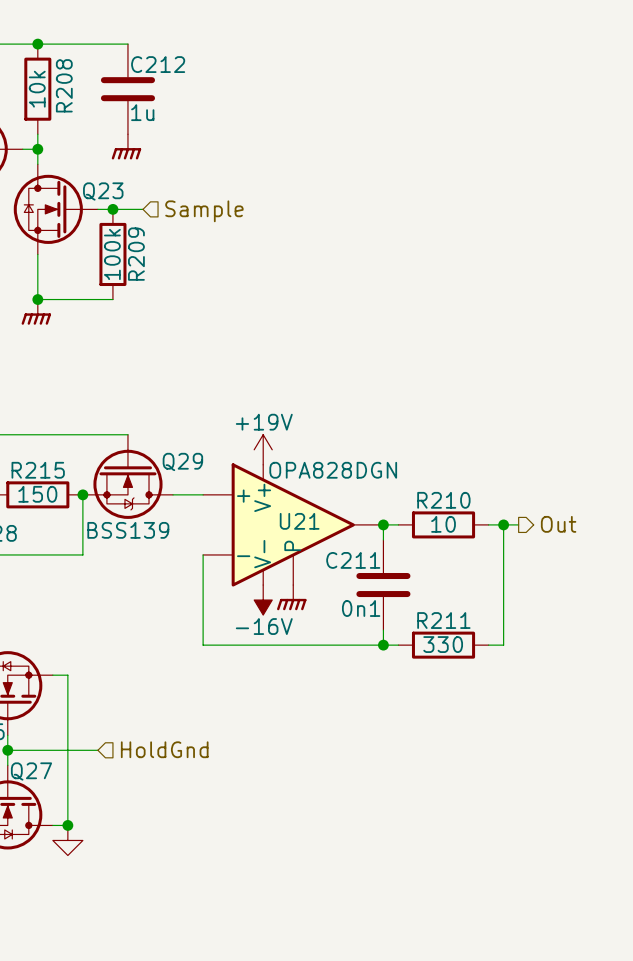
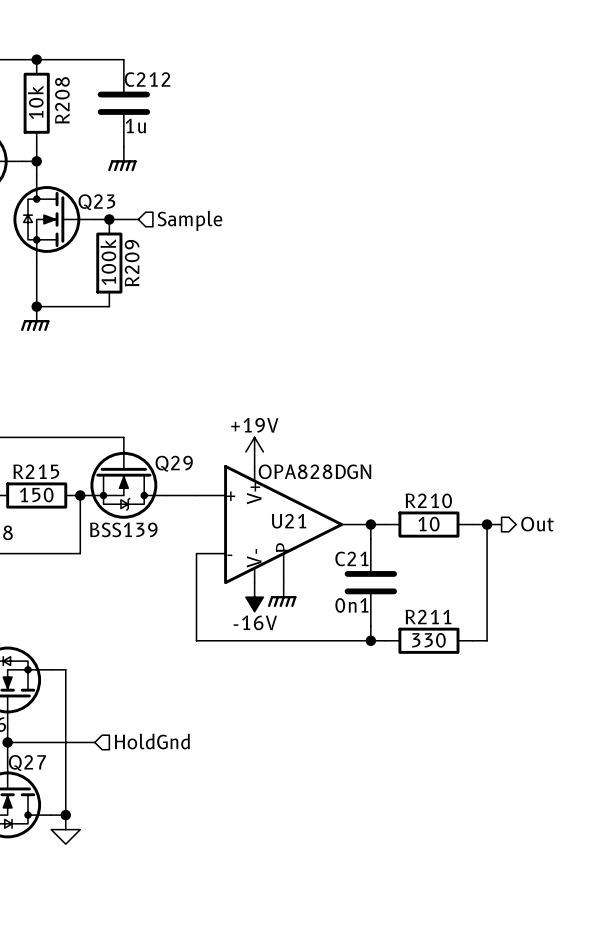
C211 name: C211 (353, 560) -> C21 (351, 558)

